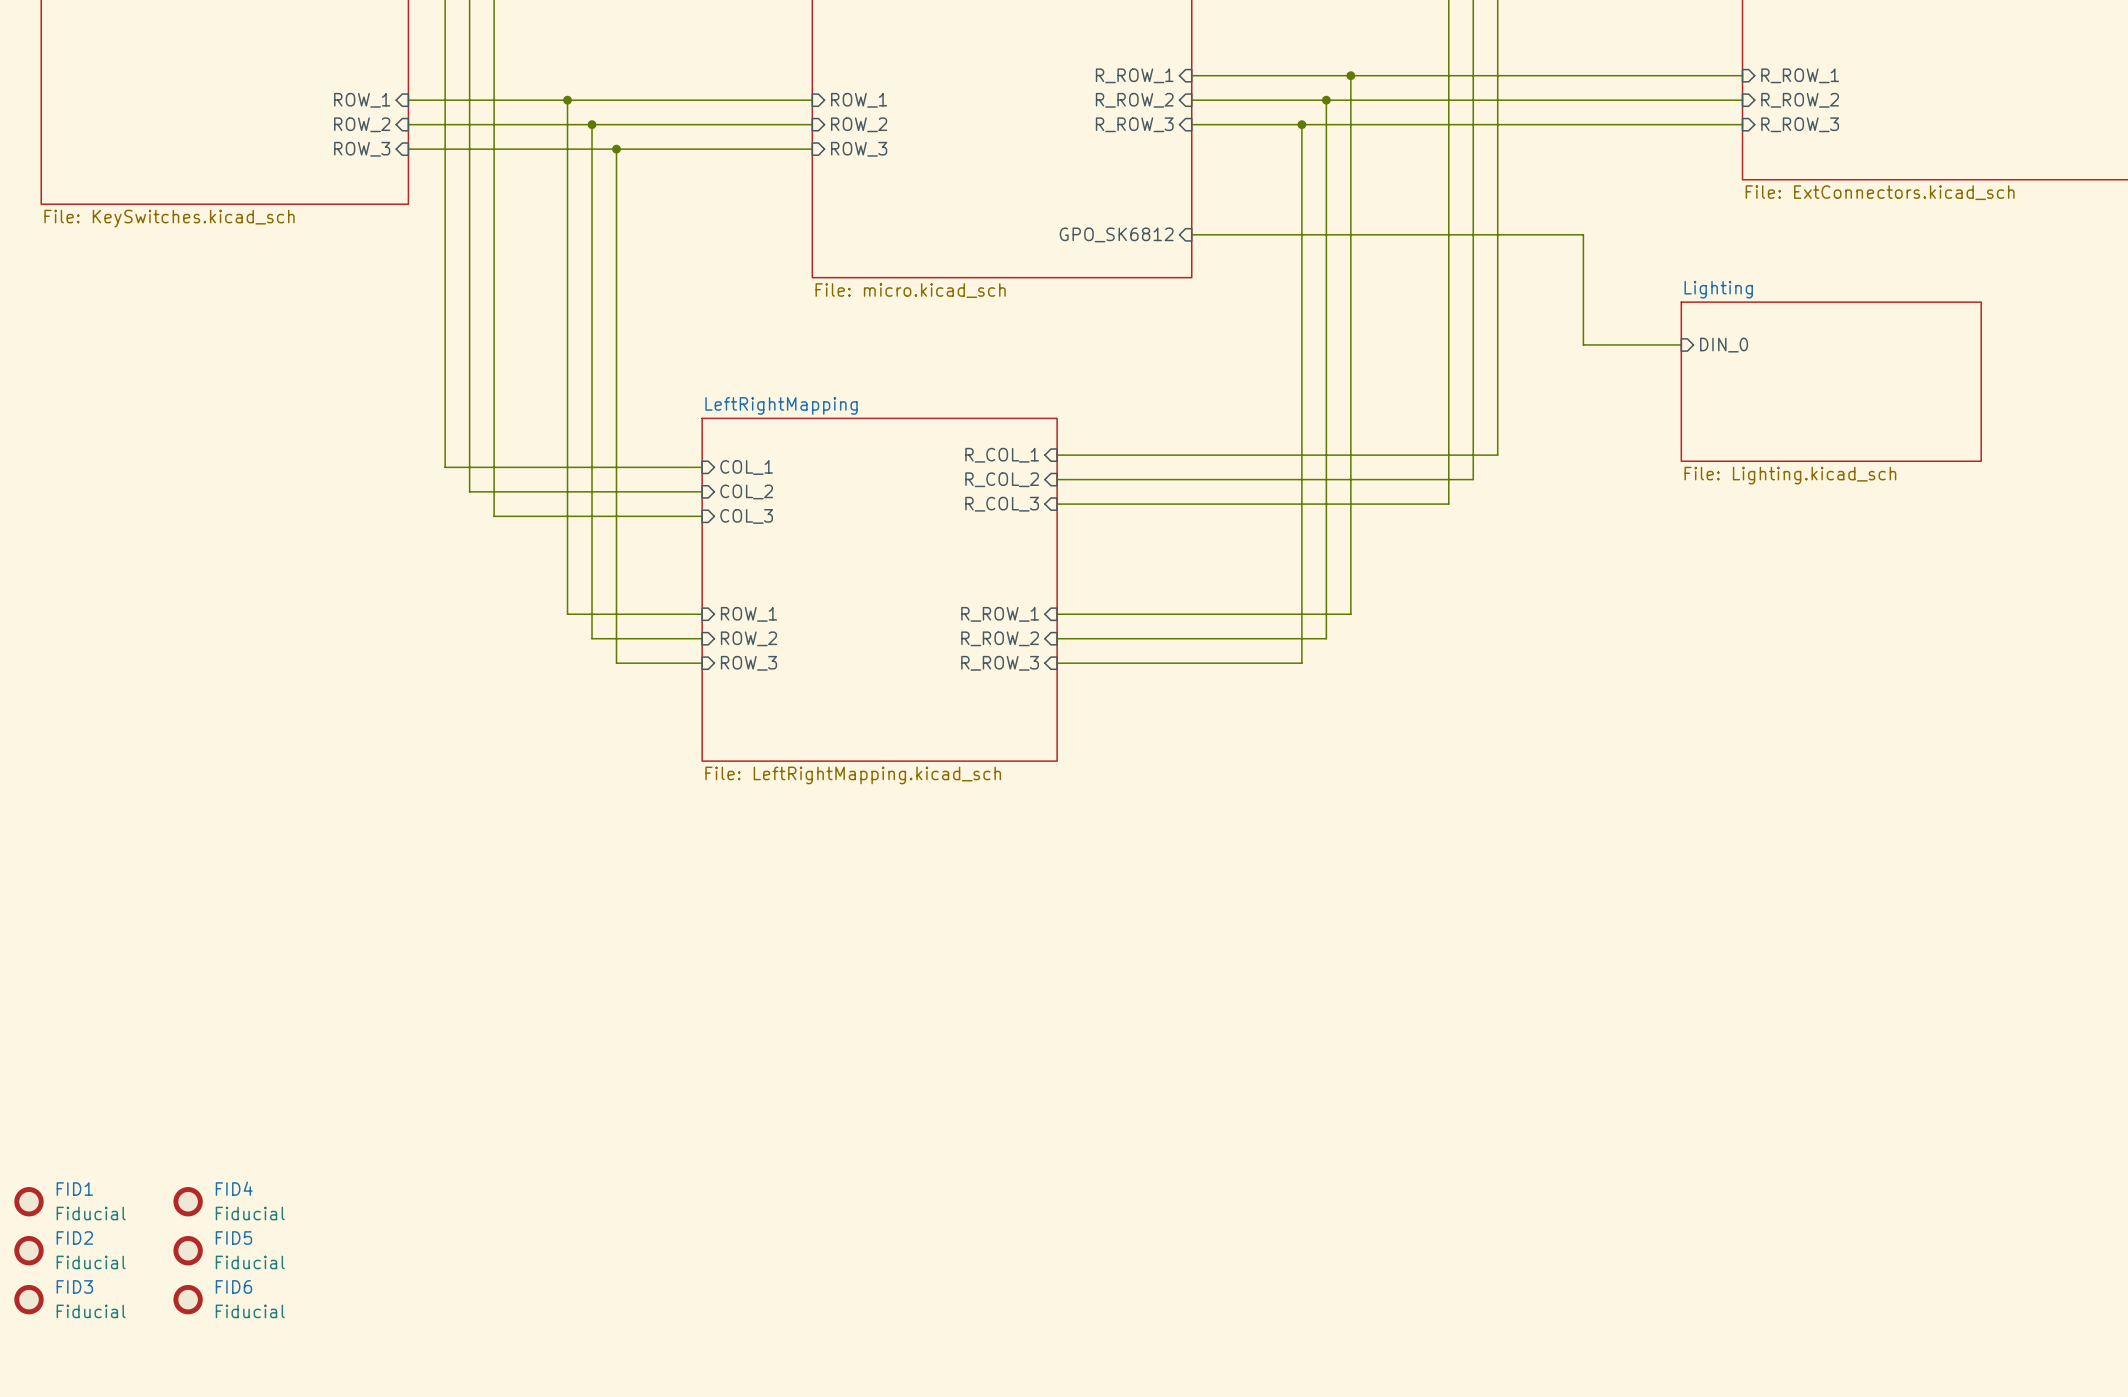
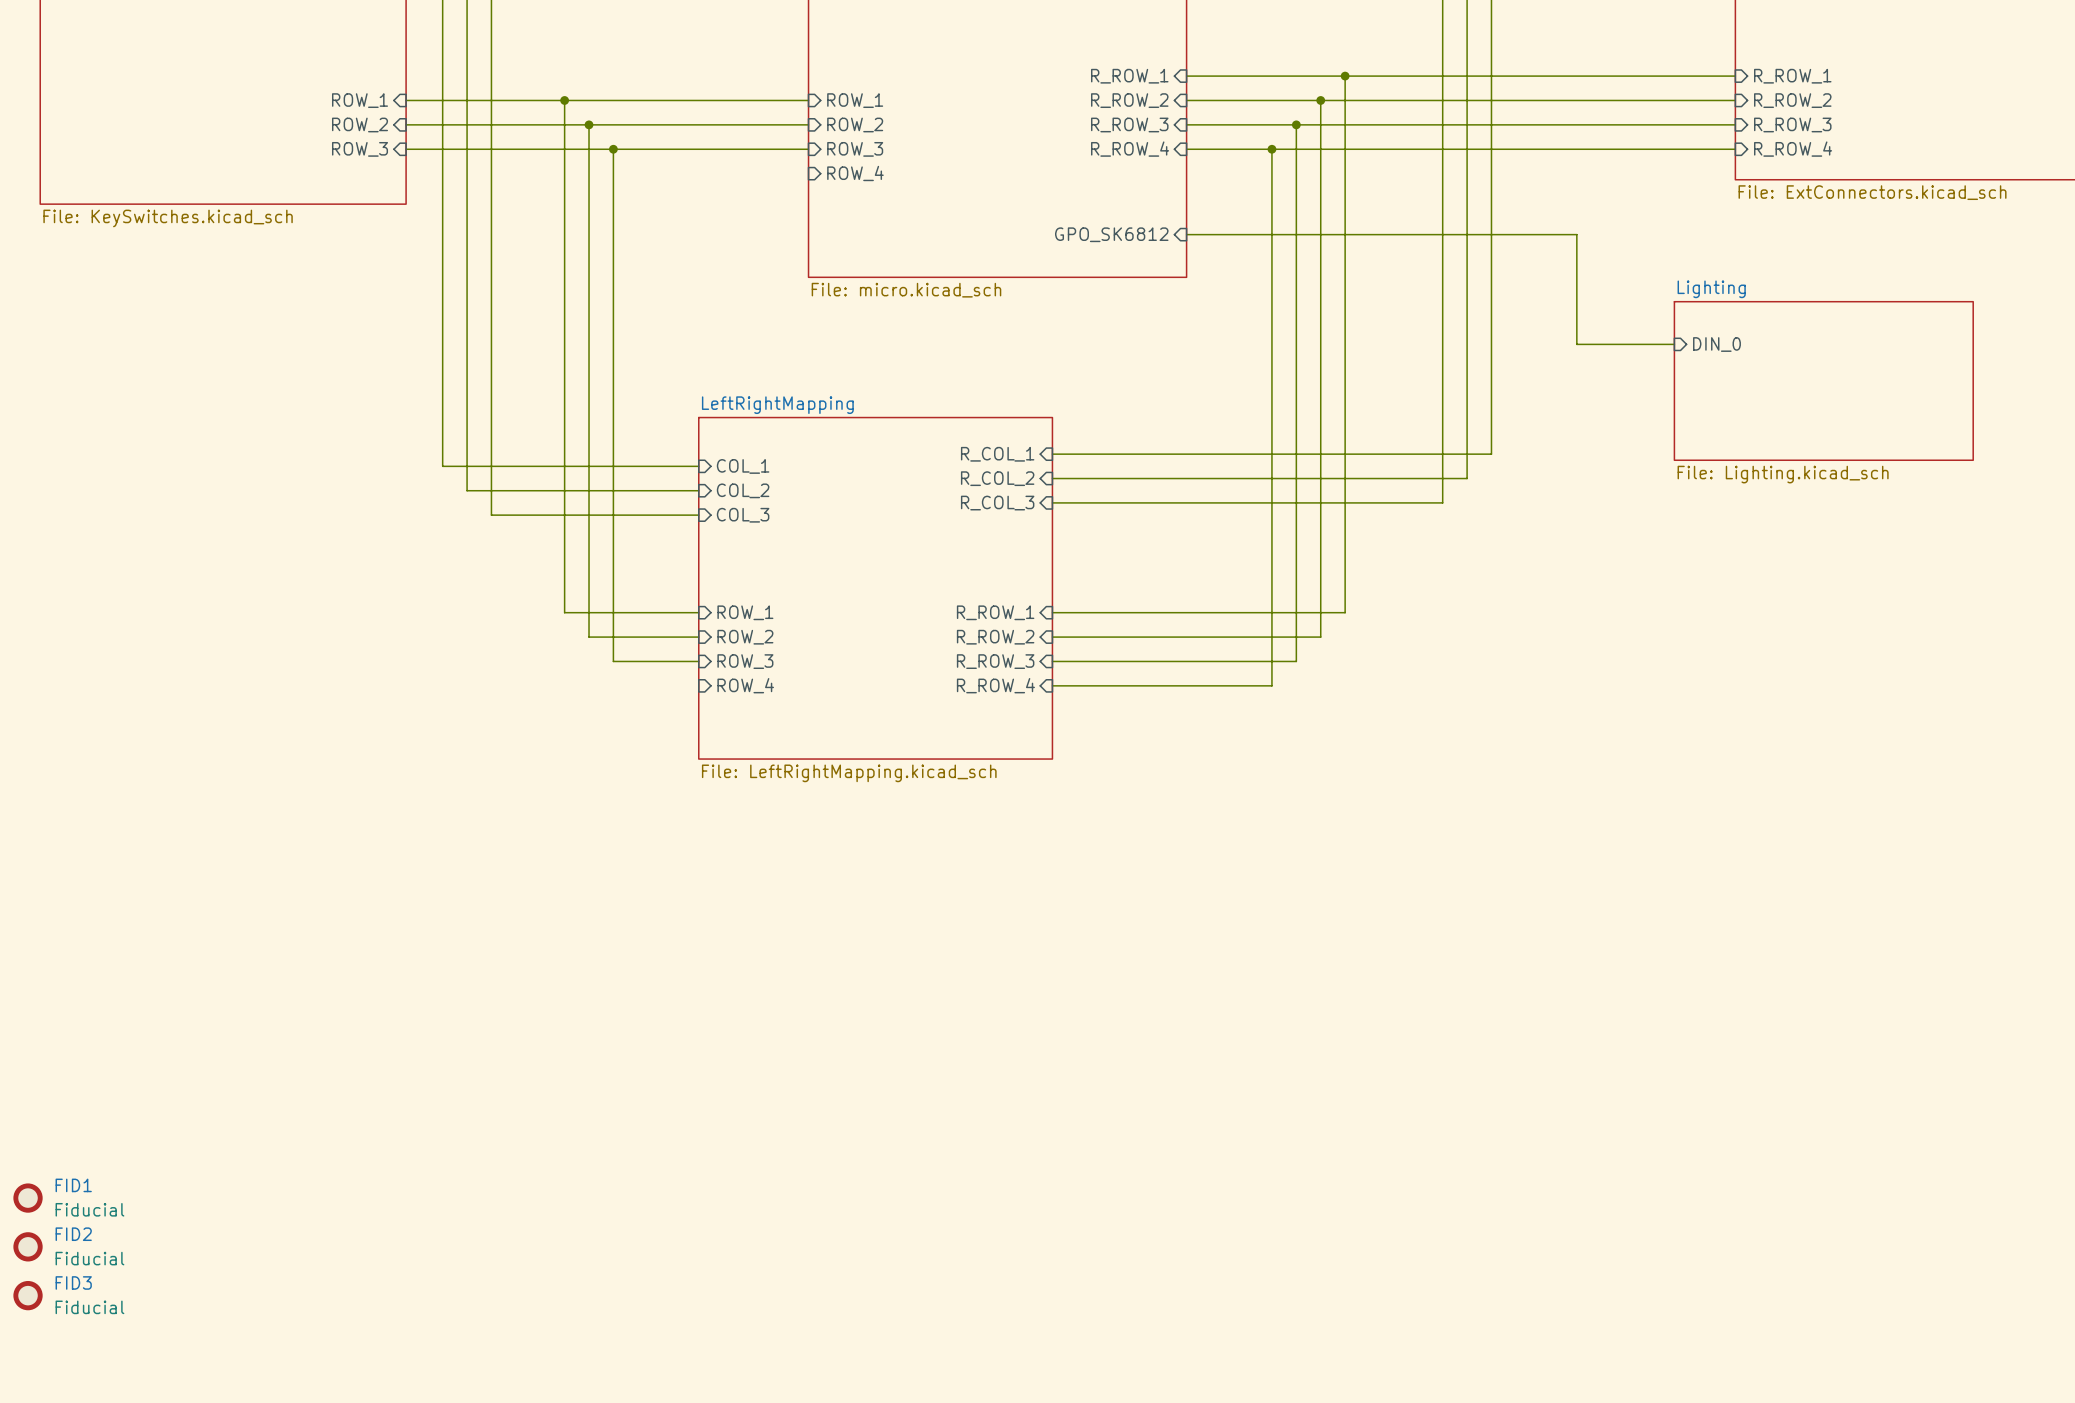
sheet pin: none -> R_ROW_4 (1130, 149)
sheet pin: none -> R_ROW_4 (1793, 149)
wire: none -> (1186, 149) (1735, 149)
wire: none -> (1271, 149) (1271, 685) (1052, 685)
junction: none -> (1271, 149)
sheet pin: none -> ROW_4 (855, 173)
sheet pin: none -> ROW_4 (745, 685)
sheet pin: none -> R_ROW_4 (995, 685)
FID4: Fiducial (188, 1201) -> none
FID5: Fiducial (188, 1250) -> none
FID6: Fiducial (188, 1299) -> none

